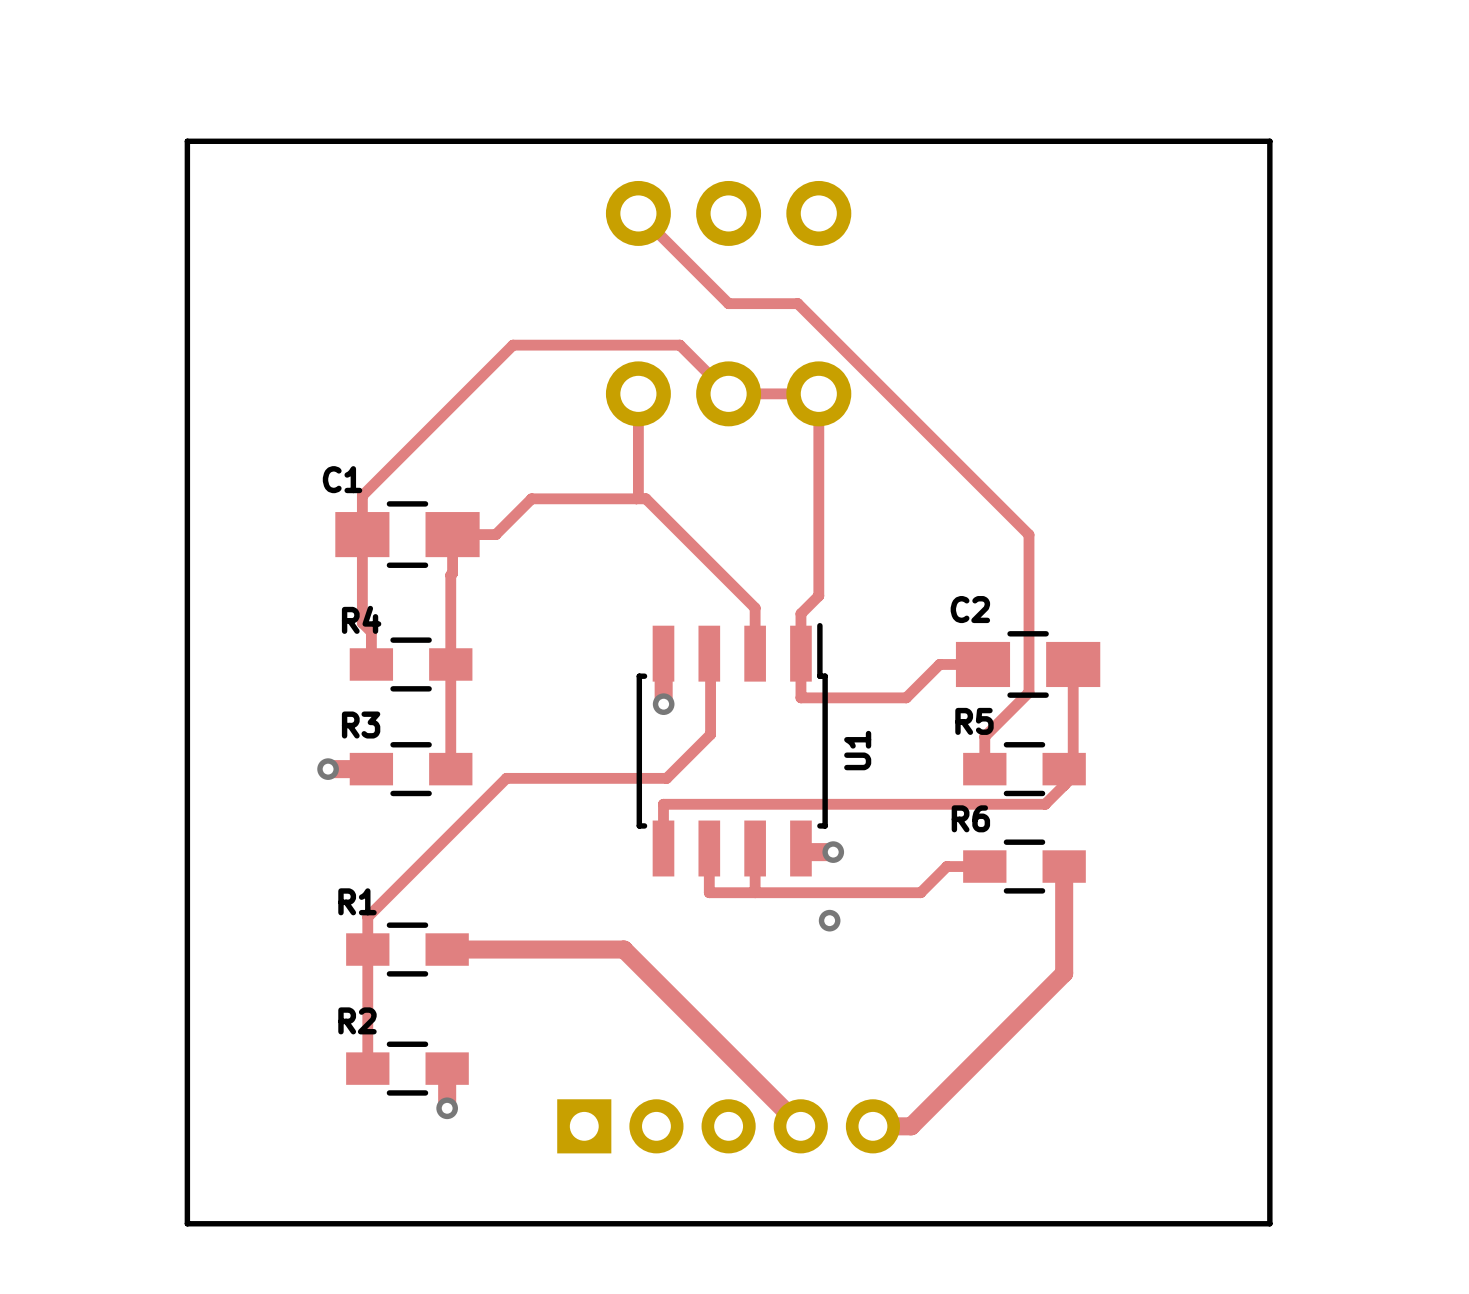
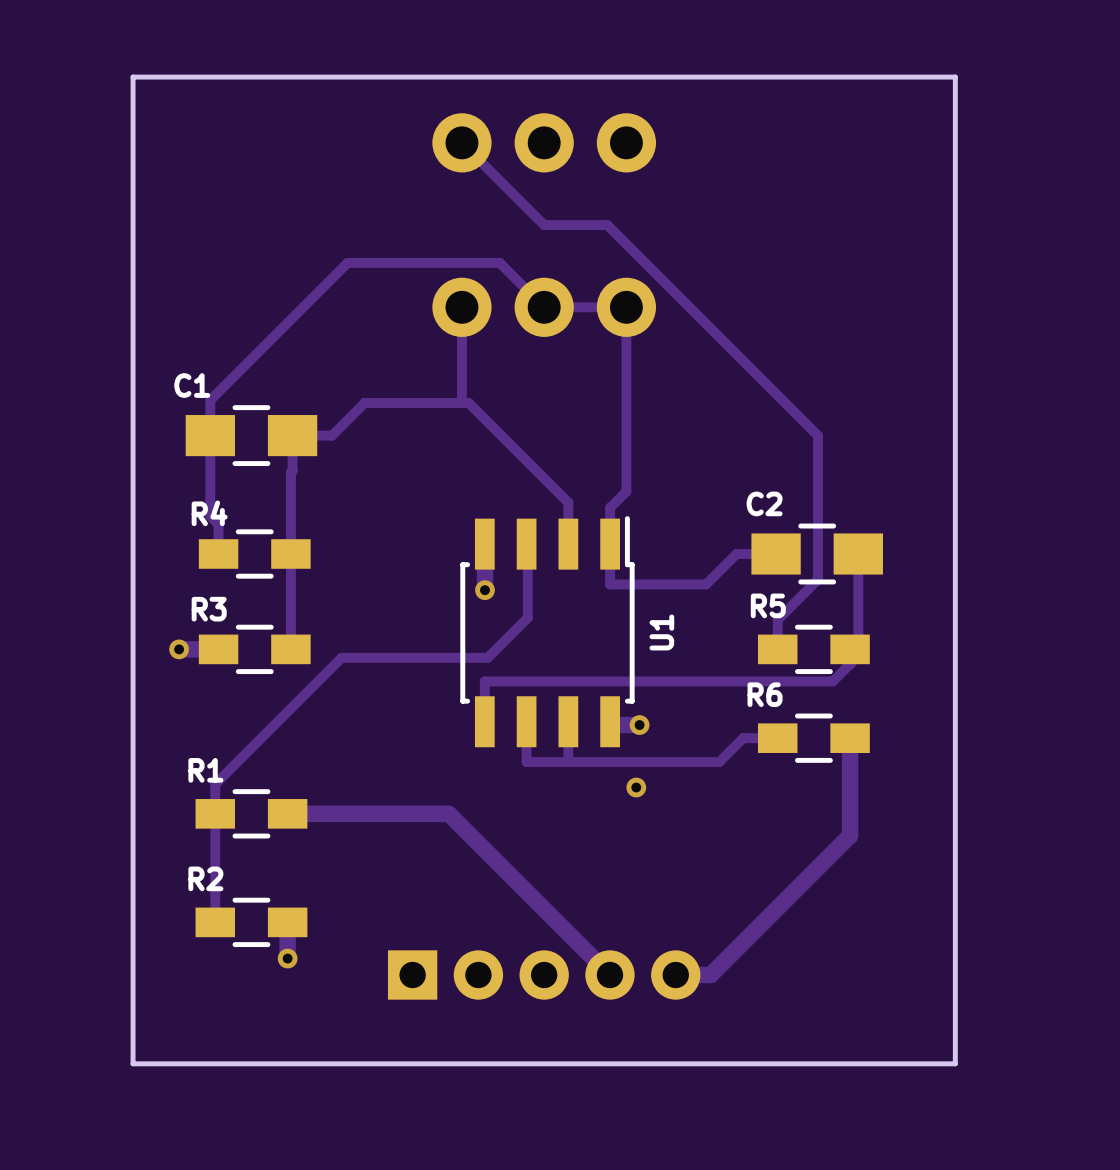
board edge: (277, 141) (187, 141) (187, 1223) (277, 1223) -> (133, 77) (133, 1063)
board edge: (1179, 141) (1269, 141) (1269, 1223) (1179, 1223) -> (955, 77) (955, 1063)

